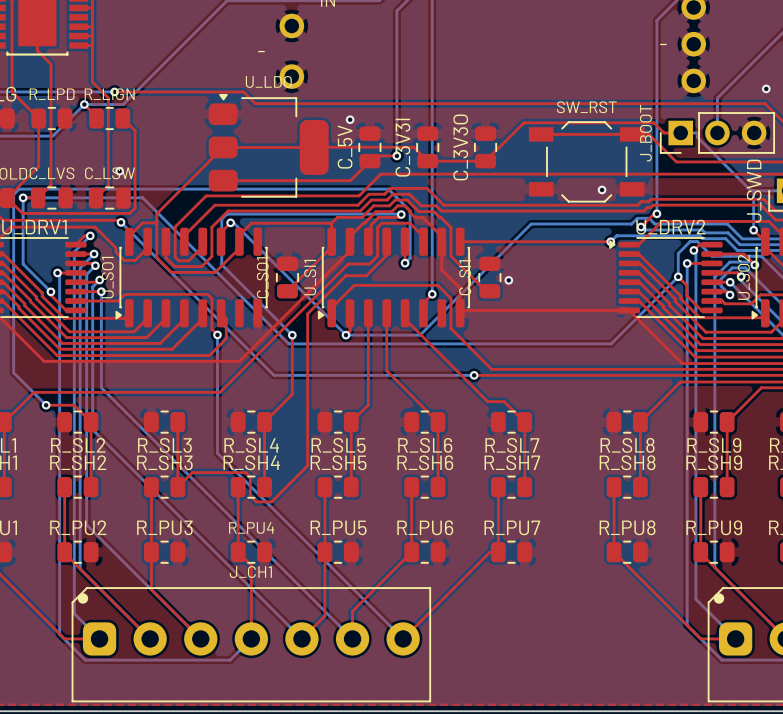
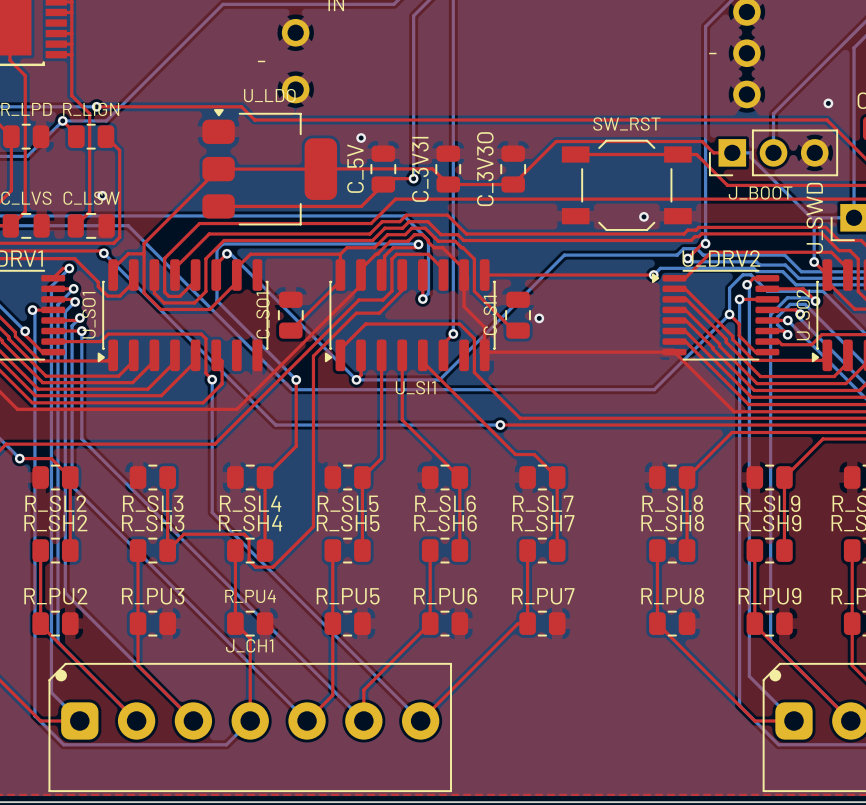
J_BOOT name rotation: 0° (645, 133) -> 90° clockwise (760, 192)
U_SI1 name rotation: 0° (310, 277) -> 90° clockwise (415, 387)
U_SI1 name position: U_SI1 (310, 277) -> U_SI1 (415, 387)

